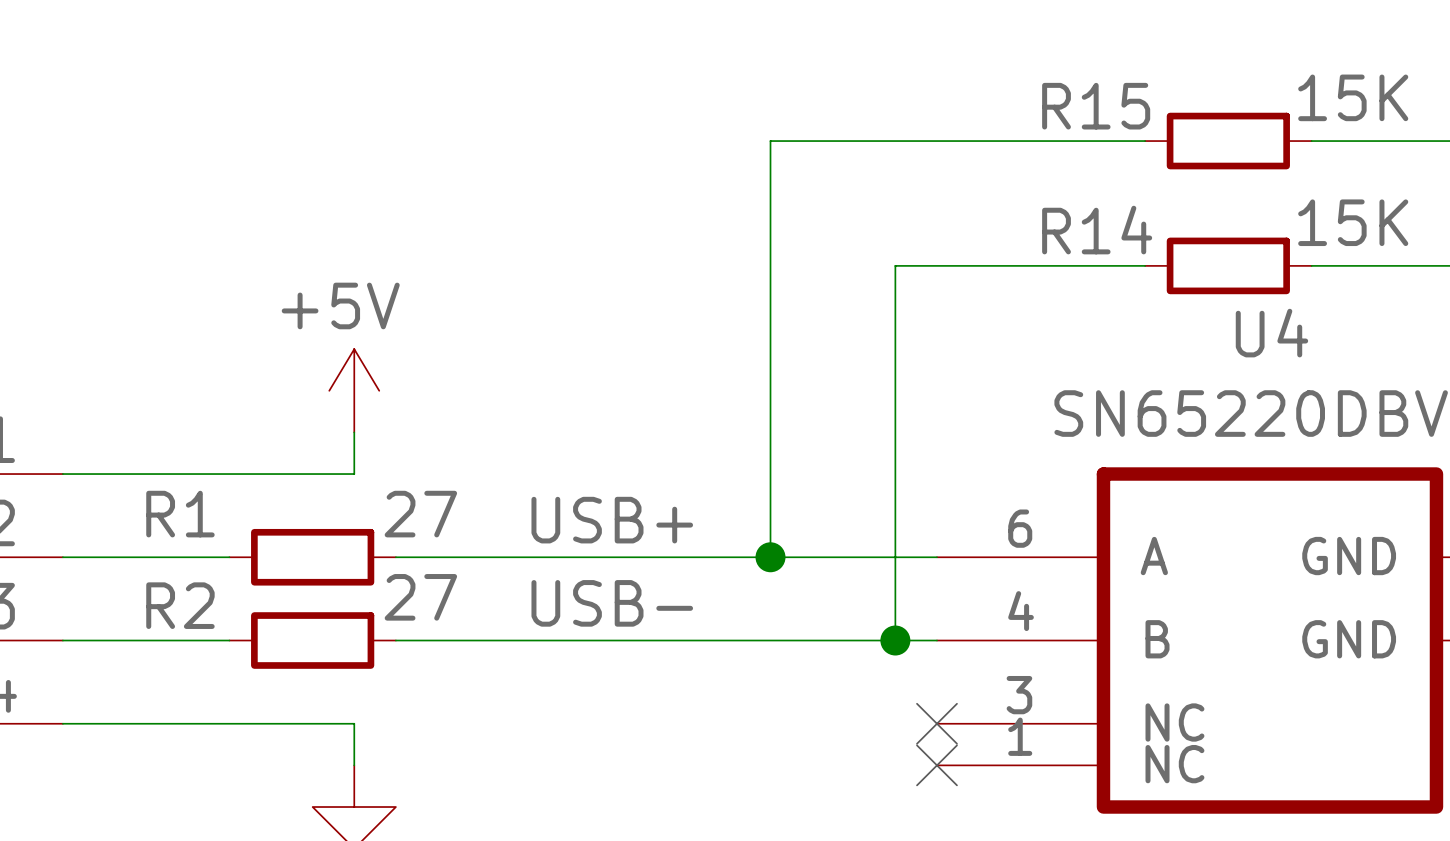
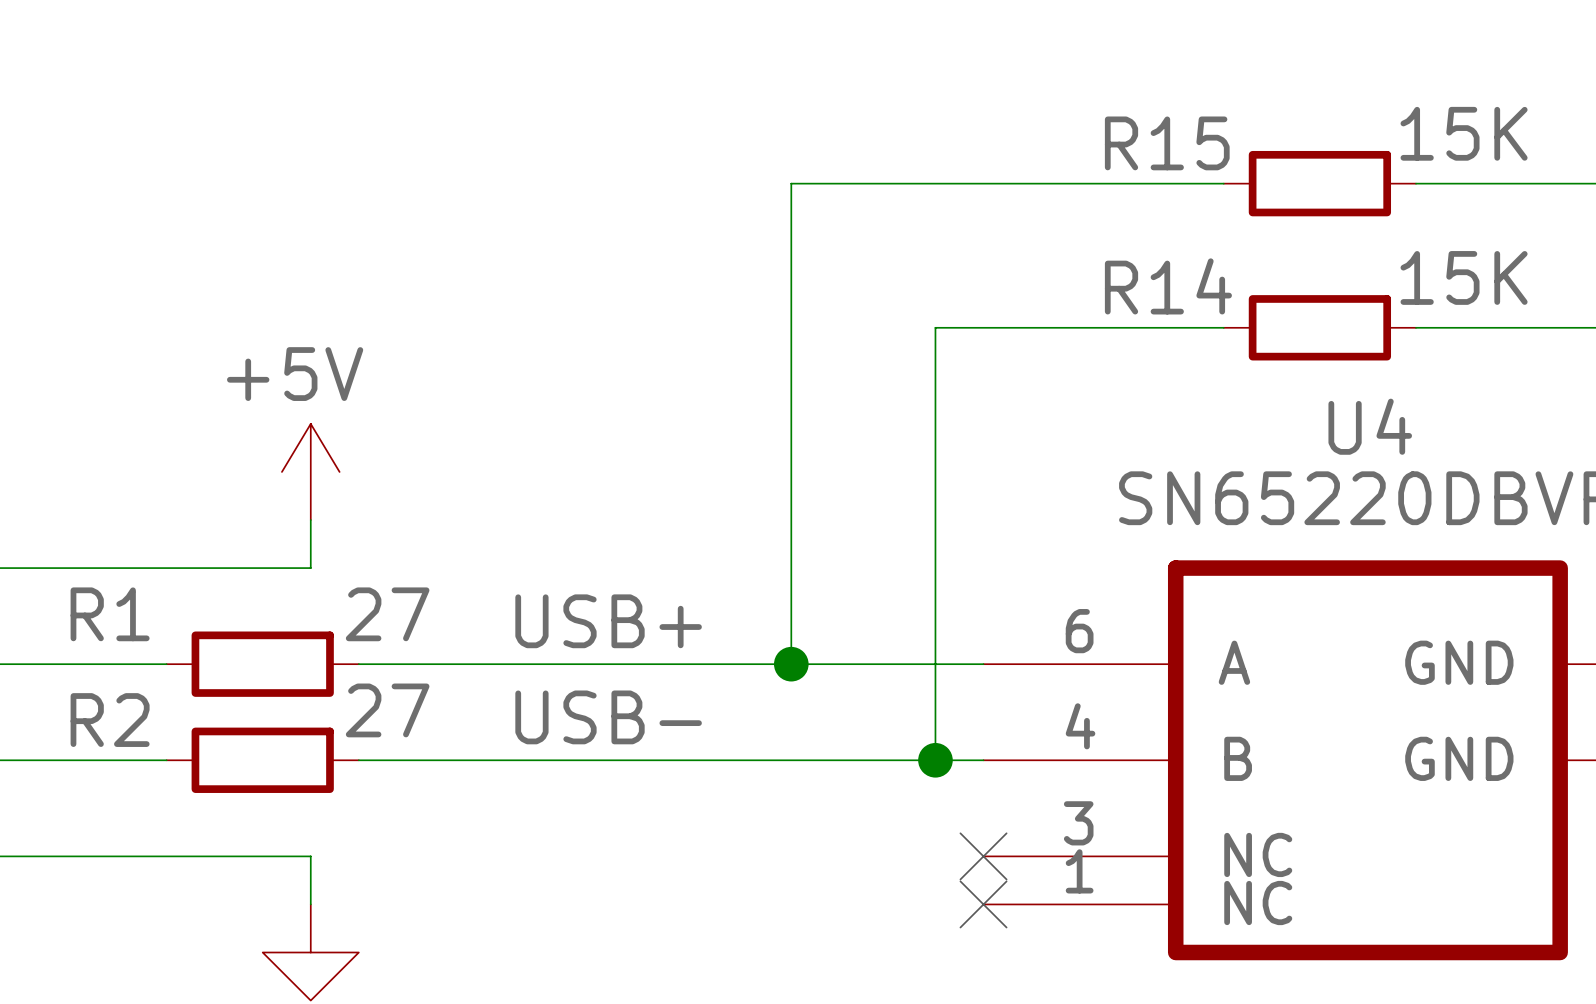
U4 name position: U4 (1271, 333) -> U4 (1370, 426)

